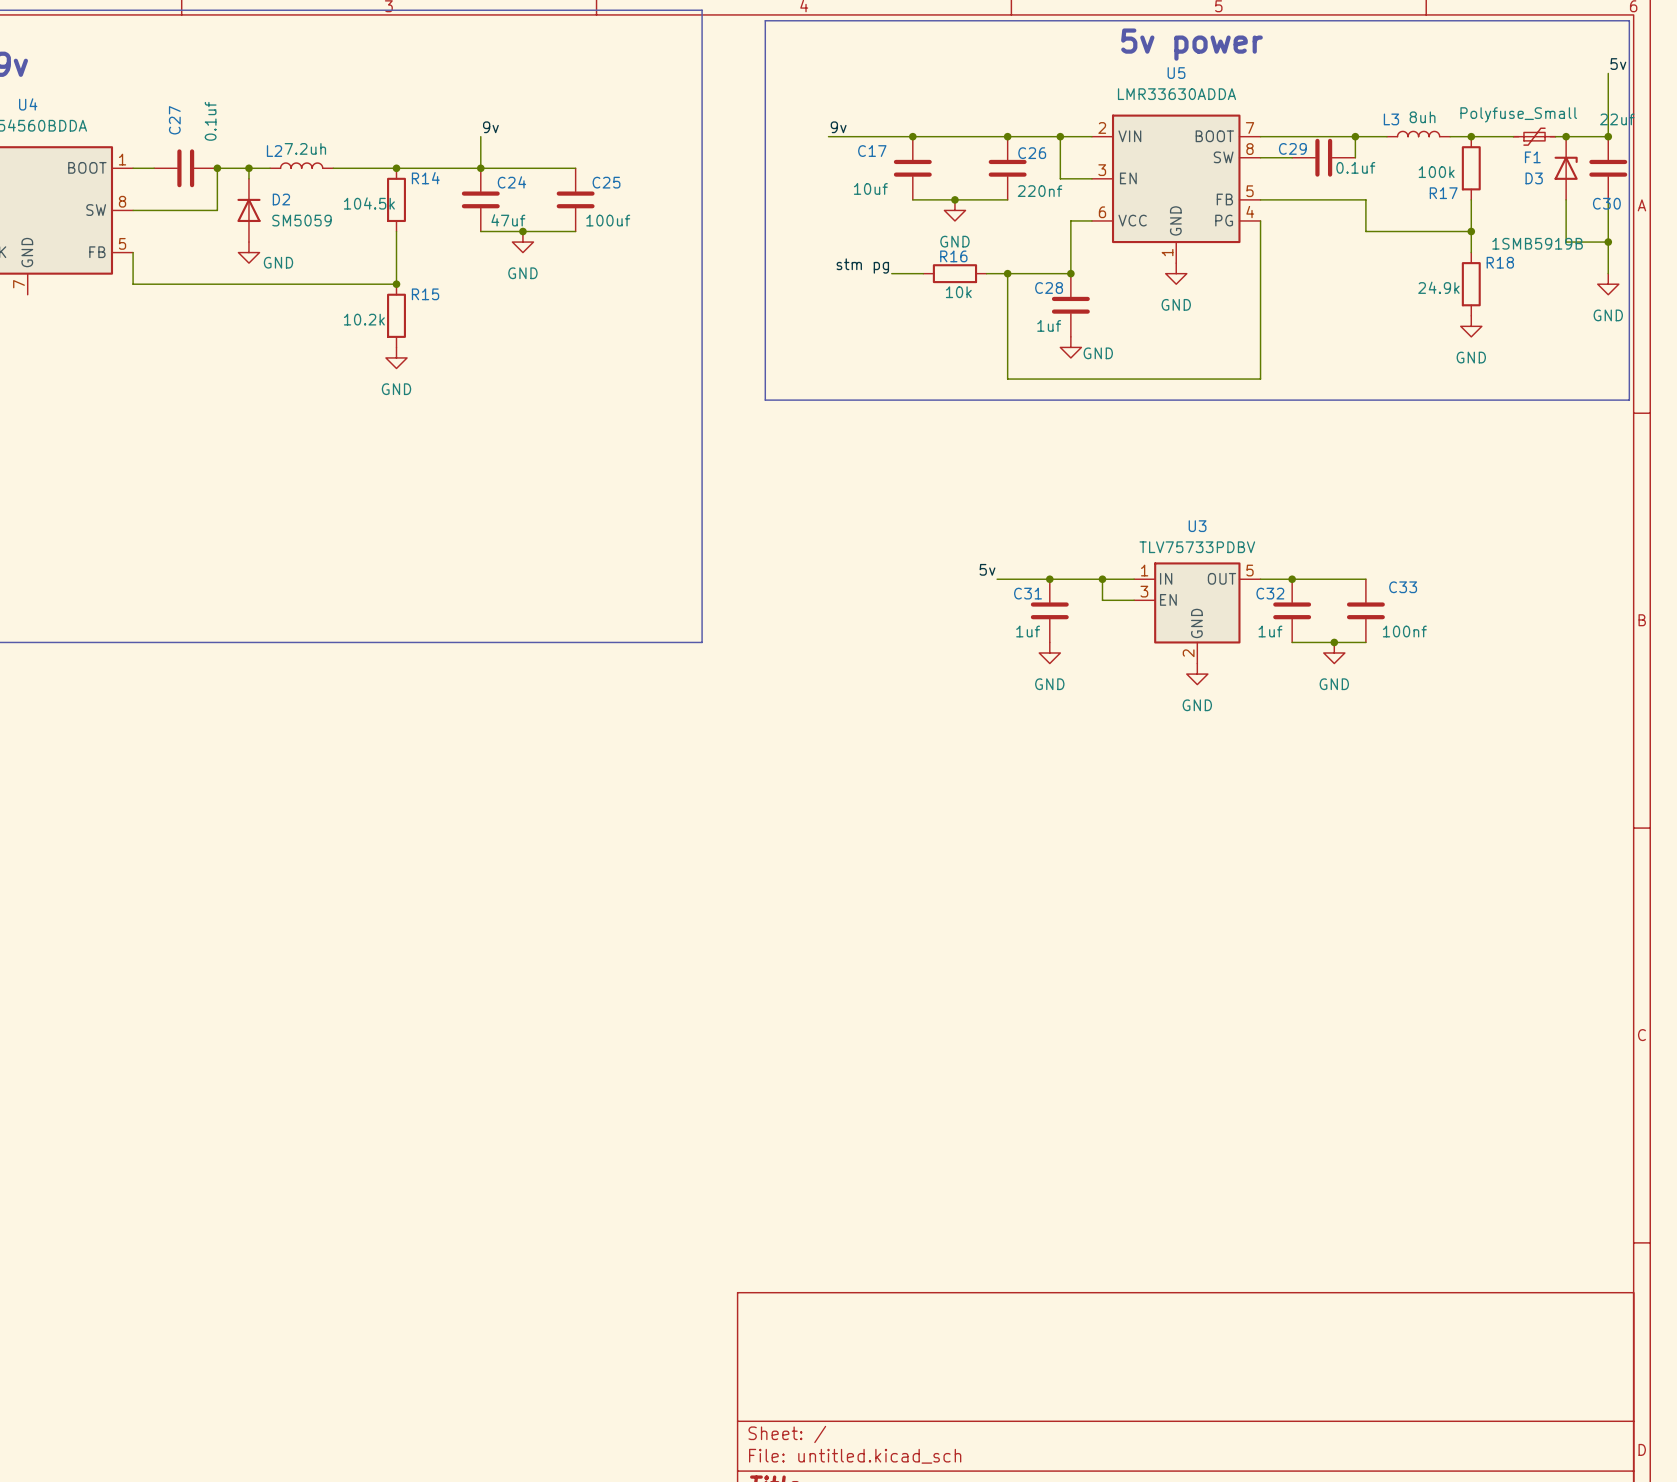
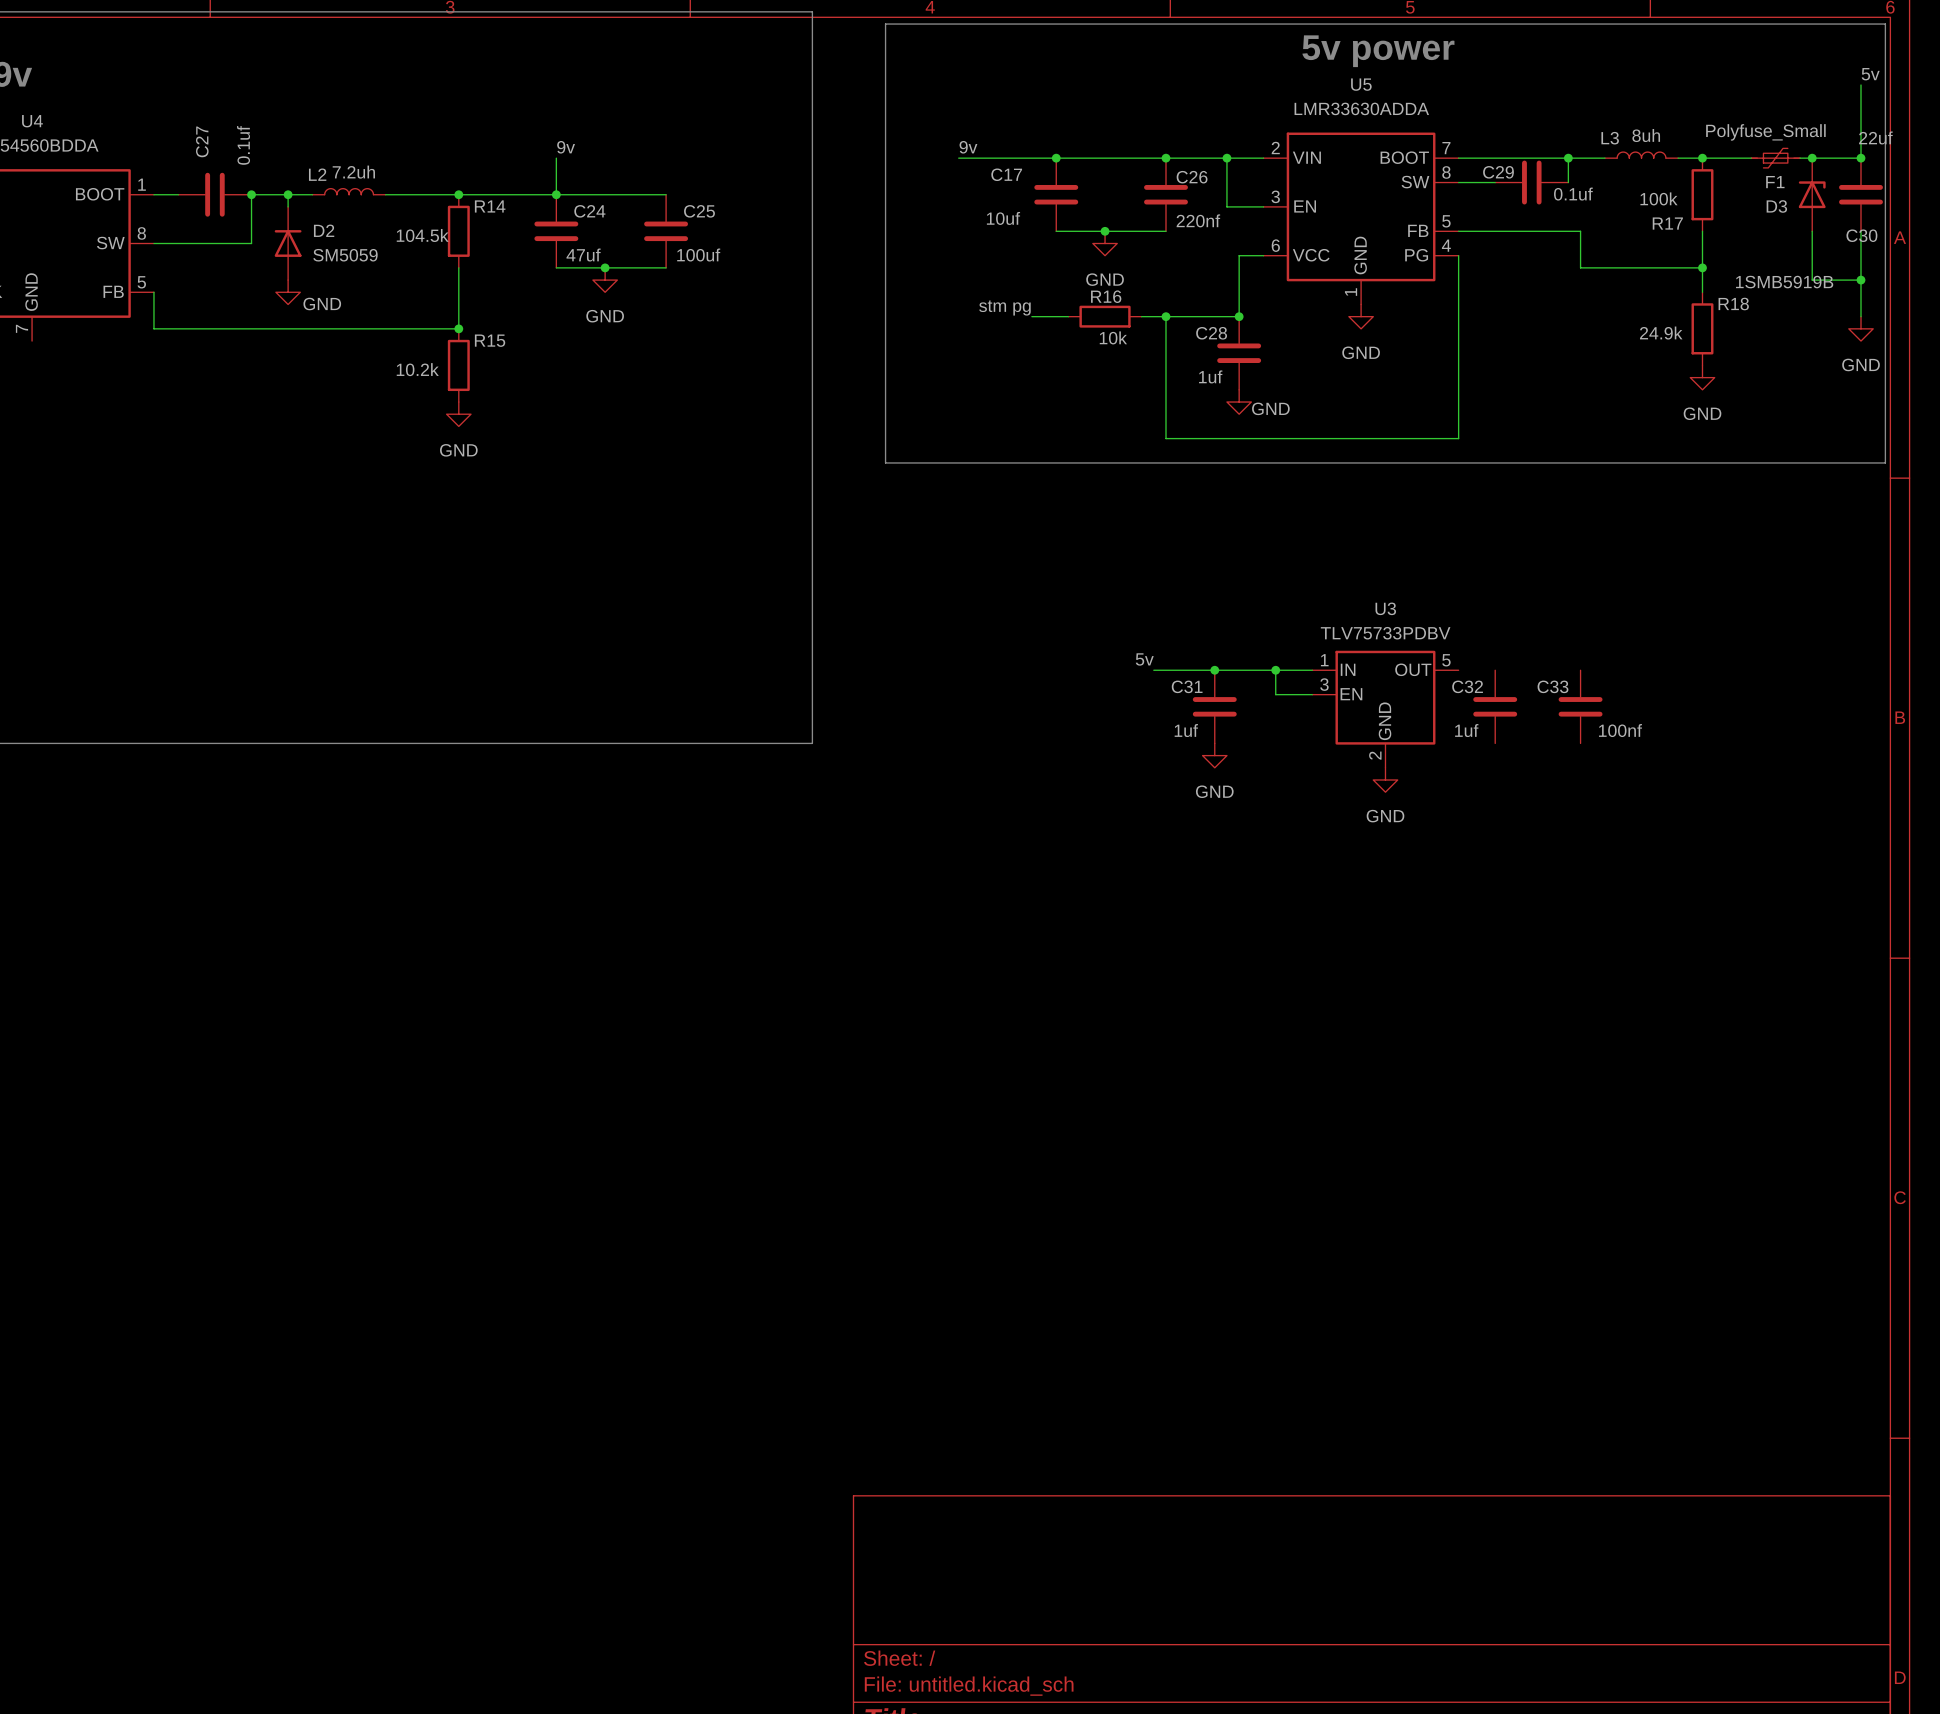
wire: (1260, 579) (1365, 579) -> none
junction: (1292, 579) -> none
C33 name position: C33 (1403, 587) -> C33 (1552, 686)
wire: (1292, 642) (1365, 642) -> none
junction: (1334, 642) -> none
power symbol: GND (1334, 652) -> none

